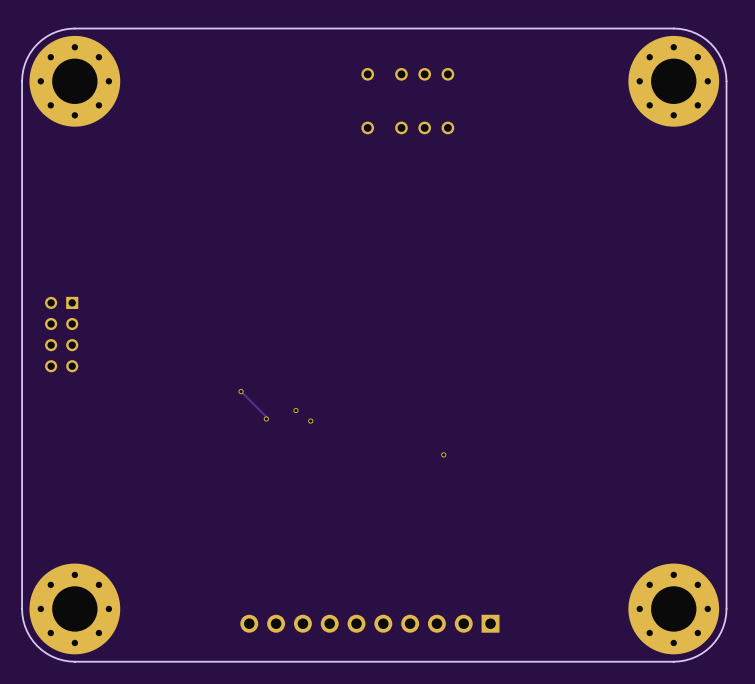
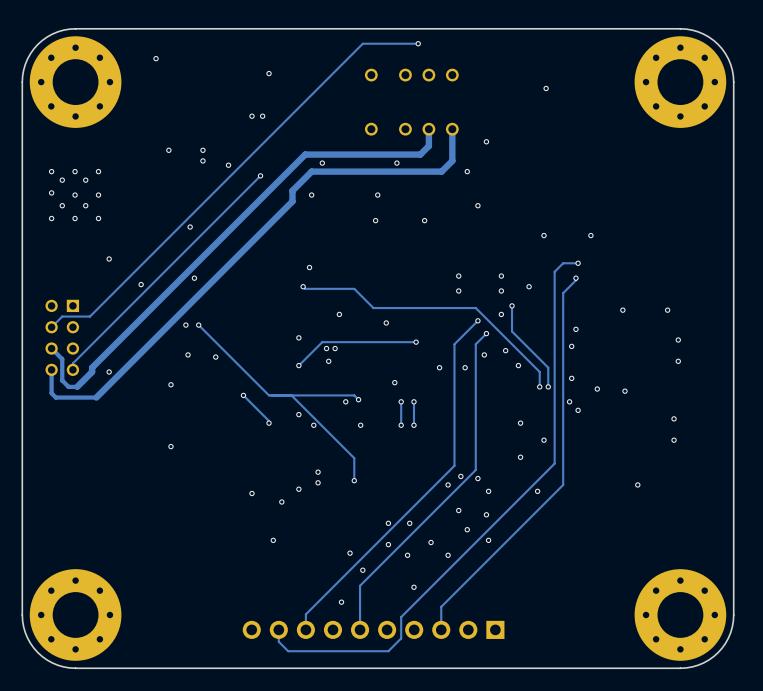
track: none -> (418, 43) (362, 43) (89, 316) (62, 316) (51, 327)
via: none -> (418, 43)
via: none -> (156, 58)
via: none -> (269, 73)
via: none -> (546, 88)
via: none -> (251, 116)
via: none -> (262, 116)
track: none -> (428, 129) (428, 146) (420, 154) (305, 154) (92, 367) (92, 371) (77, 386) (68, 386) (62, 380) (62, 359) (51, 348)
track: none -> (452, 129) (452, 160) (441, 171) (311, 171) (292, 190) (292, 201) (96, 397) (55, 397) (51, 393) (51, 369)
via: none -> (486, 141)
via: none -> (168, 150)
via: none -> (202, 150)
via: none -> (202, 160)
via: none -> (322, 163)
via: none -> (396, 163)
via: none -> (228, 165)
via: none -> (51, 171)
via: none -> (75, 171)
via: none -> (98, 171)
via: none -> (467, 171)
track: none -> (260, 175) (72, 363) (72, 369)
via: none -> (260, 175)
via: none -> (62, 180)
via: none -> (85, 180)
via: none -> (51, 192)
via: none -> (75, 195)
via: none -> (98, 195)
via: none -> (311, 195)
via: none -> (377, 195)
via: none -> (62, 205)
via: none -> (85, 205)
via: none -> (477, 205)
via: none -> (51, 218)
via: none -> (75, 218)
via: none -> (98, 218)
via: none -> (375, 220)
via: none -> (424, 220)
via: none -> (190, 227)
via: none -> (544, 235)
via: none -> (590, 235)
via: none -> (109, 259)
track: none -> (578, 263) (563, 263) (554, 271) (554, 463) (401, 617) (401, 638) (388, 651) (288, 651) (278, 641) (278, 629)
via: none -> (578, 263)
via: none -> (309, 267)
via: none -> (458, 276)
via: none -> (501, 276)
via: none -> (194, 278)
track: none -> (575, 278) (563, 293) (563, 484) (441, 606) (441, 629)
via: none -> (575, 278)
via: none -> (141, 284)
track: none -> (303, 286) (305, 288) (354, 288) (373, 308) (475, 308) (539, 371) (539, 386)
via: none -> (303, 286)
via: none -> (529, 286)
via: none -> (458, 290)
via: none -> (501, 290)
track: none -> (512, 305) (512, 331) (548, 367) (548, 386)
via: none -> (512, 305)
via: none -> (622, 310)
via: none -> (667, 310)
via: none -> (339, 314)
via: none -> (501, 314)
track: none -> (477, 320) (454, 344) (454, 465) (305, 614) (305, 629)
via: none -> (477, 320)
via: none -> (386, 322)
via: none -> (185, 325)
track: none -> (198, 325) (269, 395) (354, 395) (358, 399)
via: none -> (198, 325)
via: none -> (575, 329)
track: none -> (486, 333) (475, 344) (475, 470) (360, 585) (360, 629)
via: none -> (486, 333)
via: none -> (298, 337)
via: none -> (678, 340)
track: none -> (416, 342) (322, 342) (298, 365)
via: none -> (416, 342)
via: none -> (571, 346)
via: none -> (326, 348)
via: none -> (335, 348)
via: none -> (505, 350)
via: none -> (188, 354)
via: none -> (484, 354)
via: none -> (215, 357)
via: none -> (328, 361)
via: none -> (678, 361)
via: none -> (298, 365)
via: none -> (518, 365)
via: none -> (439, 367)
via: none -> (465, 367)
via: none -> (109, 371)
via: none -> (571, 378)
via: none -> (394, 382)
via: none -> (170, 384)
via: none -> (539, 386)
via: none -> (548, 386)
via: none -> (597, 389)
via: none -> (625, 391)
track: none -> (291, 395) (354, 458) (354, 480)
via: none -> (358, 399)
via: none -> (345, 401)
track: none -> (401, 401) (401, 425)
via: none -> (401, 401)
track: none -> (413, 401) (413, 425)
via: none -> (413, 401)
via: none -> (569, 401)
via: none -> (578, 410)
via: none -> (674, 418)
via: none -> (520, 423)
via: none -> (360, 425)
via: none -> (401, 425)
via: none -> (413, 425)
via: none -> (544, 440)
via: none -> (674, 440)
via: none -> (170, 446)
via: none -> (520, 457)
via: (443, 454) -> none
via: none -> (318, 472)
via: none -> (460, 476)
via: none -> (477, 478)
via: none -> (354, 480)
via: none -> (318, 482)
via: none -> (448, 484)
via: none -> (637, 484)
via: none -> (298, 489)
via: none -> (488, 491)
via: none -> (537, 491)
via: none -> (251, 493)
via: none -> (281, 502)
via: none -> (458, 510)
via: none -> (486, 514)
via: none -> (388, 523)
via: none -> (409, 523)
via: none -> (467, 529)
via: none -> (273, 540)
via: none -> (488, 540)
via: none -> (431, 542)
via: none -> (388, 544)
via: none -> (350, 553)
via: none -> (407, 555)
via: none -> (448, 555)
via: none -> (362, 570)
via: none -> (413, 587)
via: none -> (341, 602)

